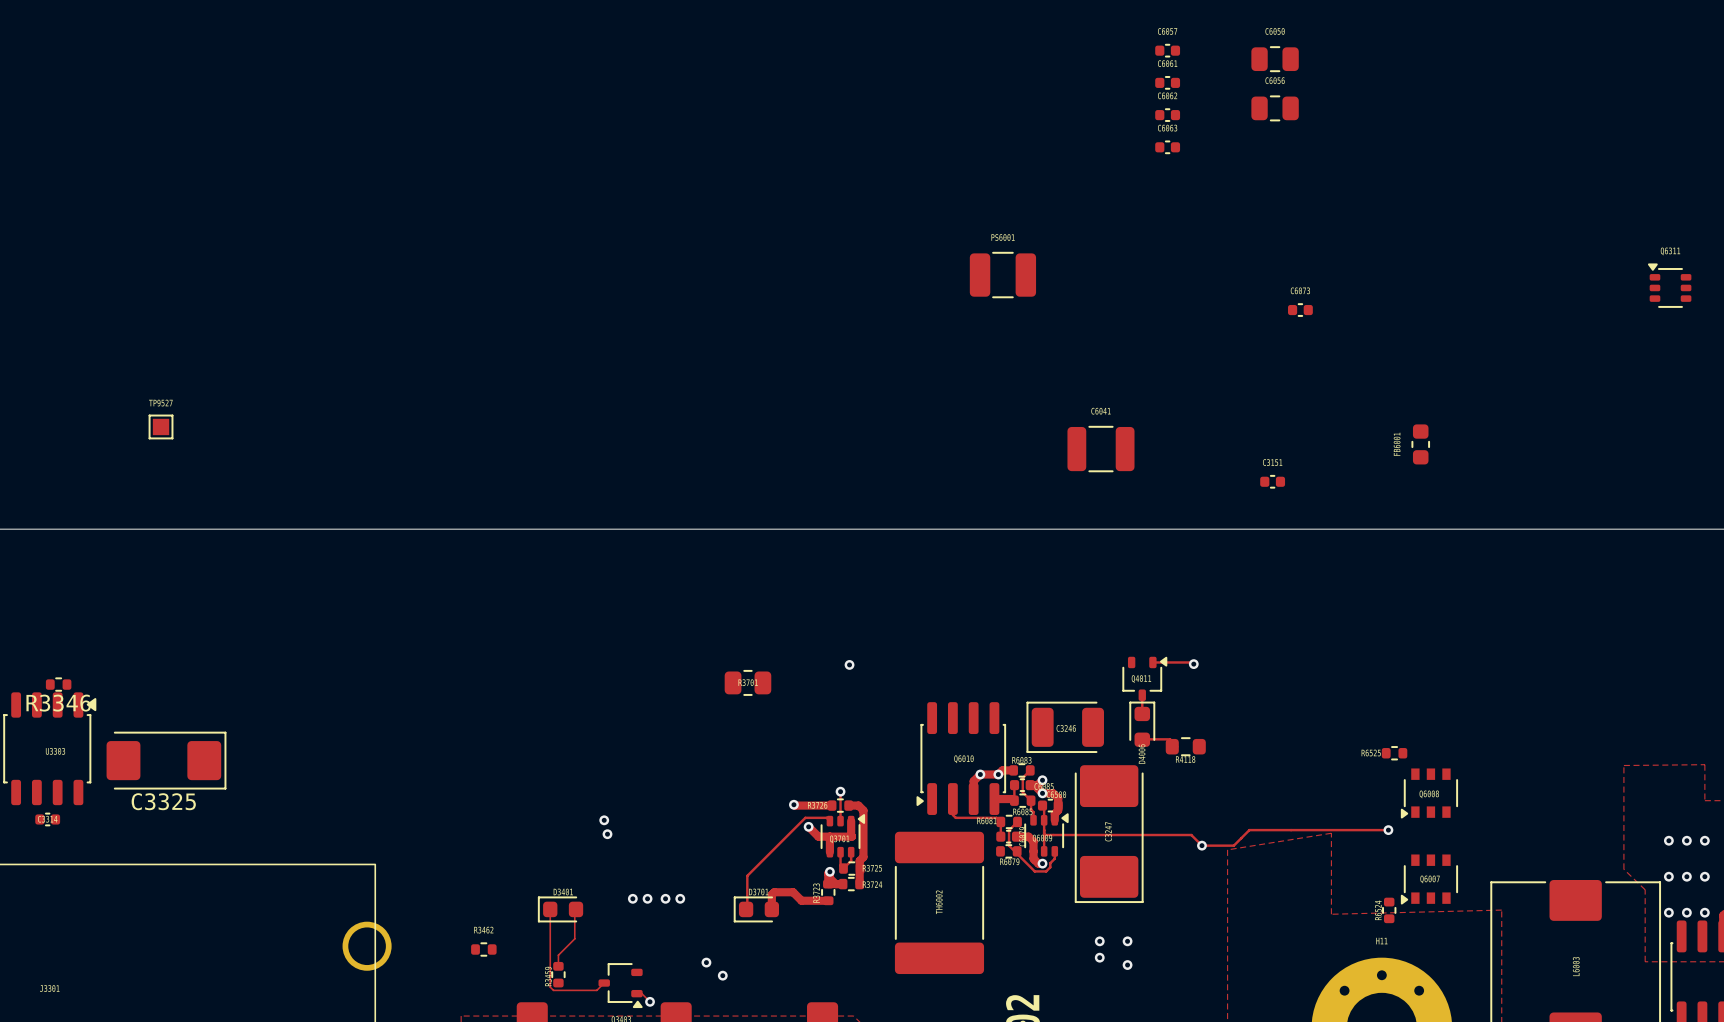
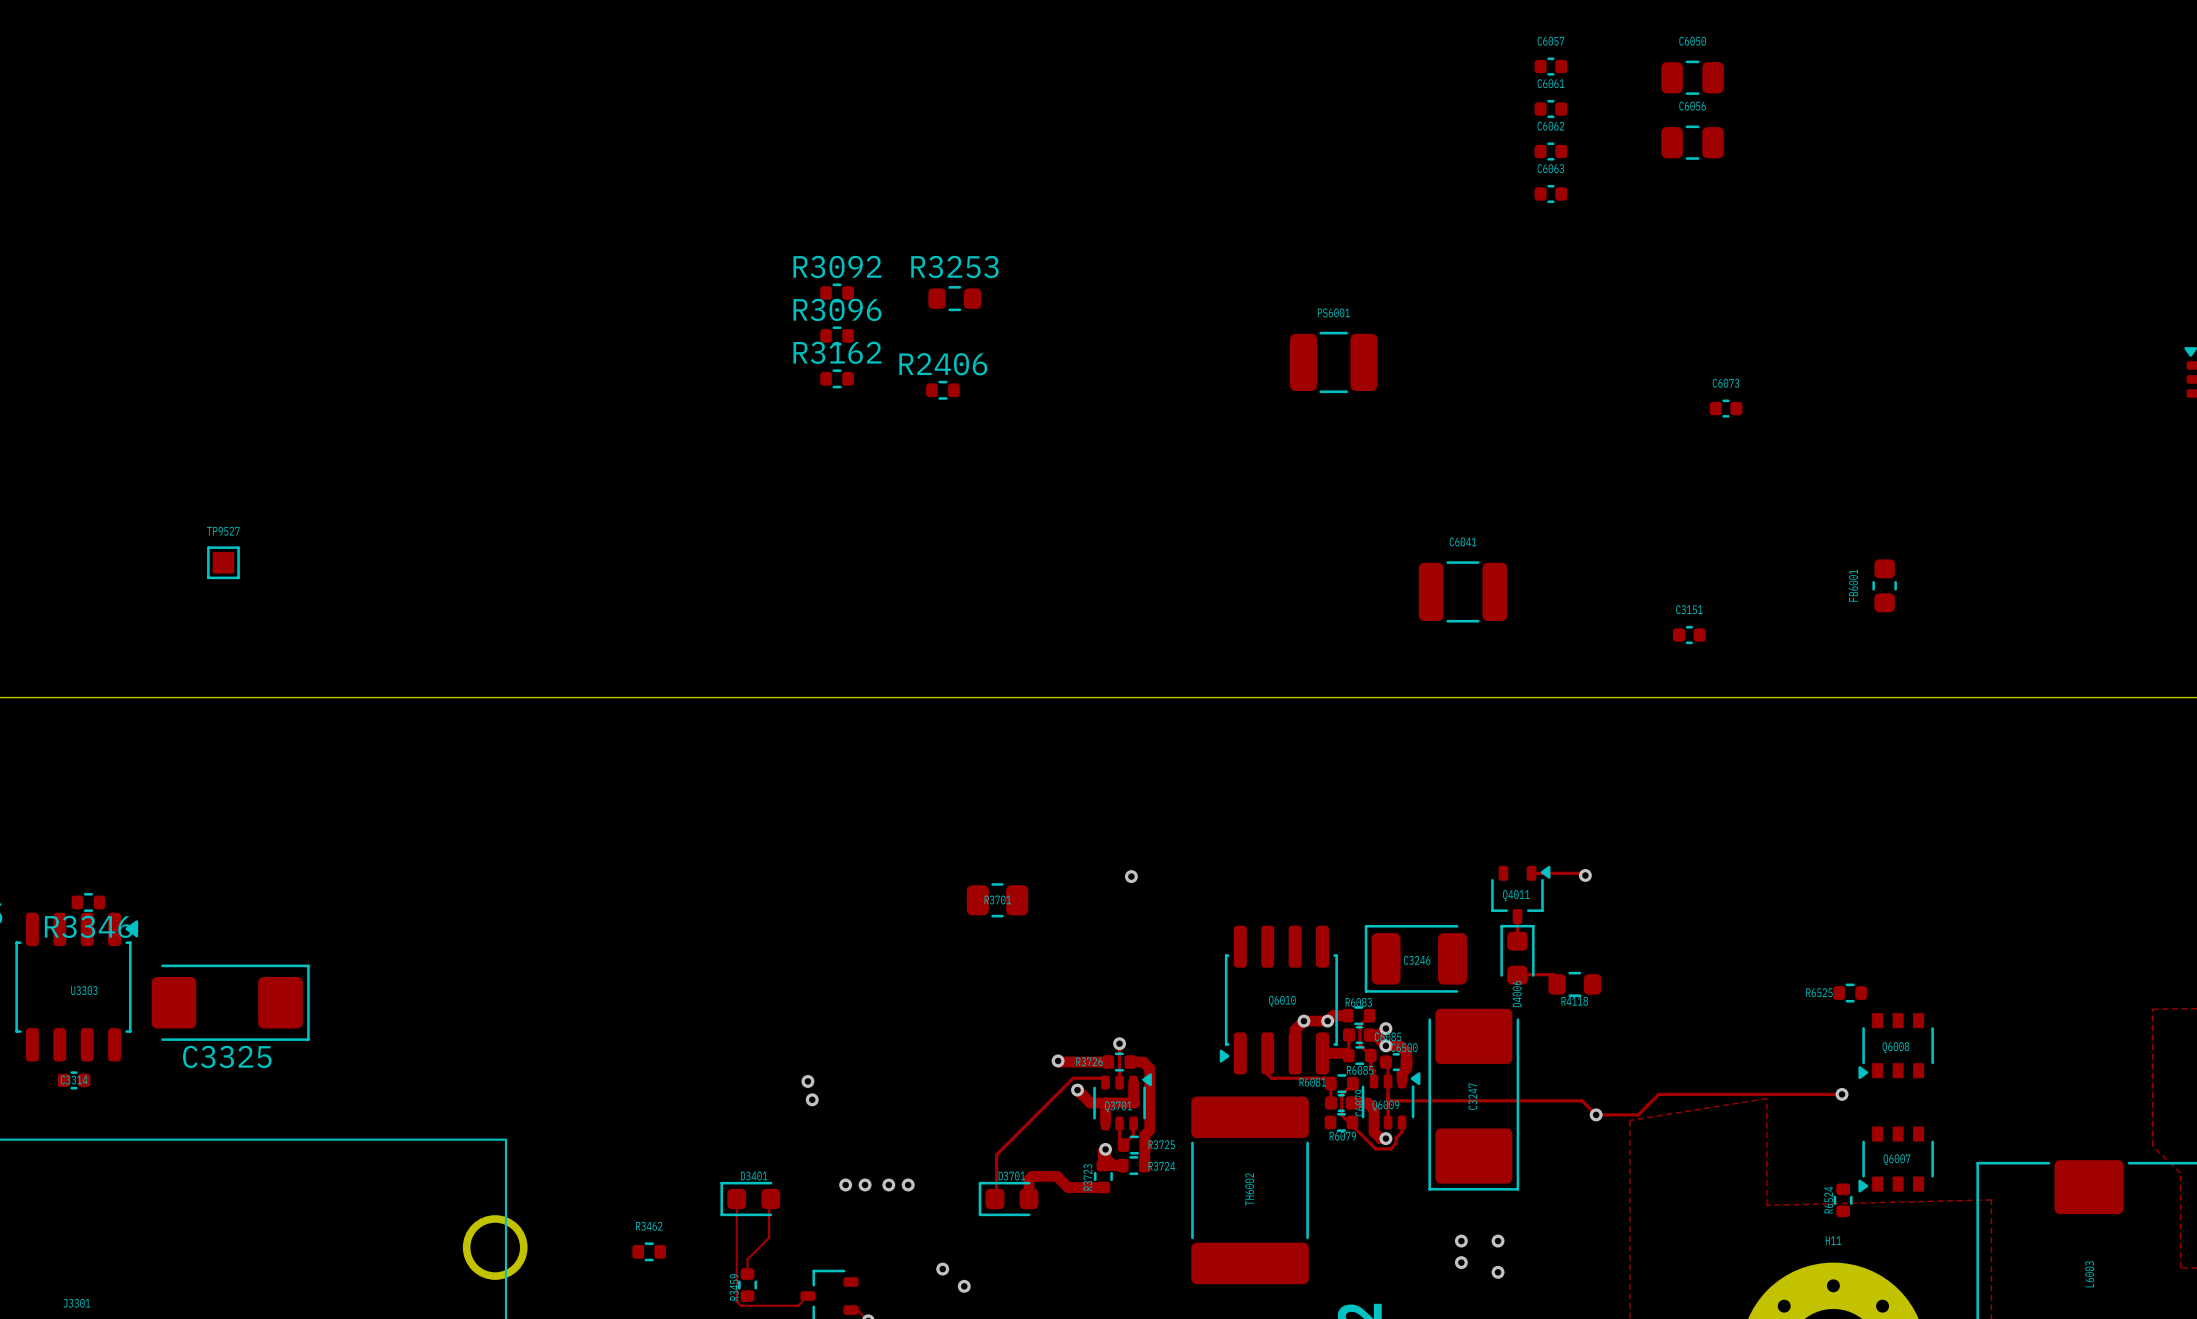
R3092: none -> (837, 293)
R3253: none -> (954, 298)
R3096: none -> (837, 335)
R3162: none -> (837, 378)
R2406: none -> (942, 390)

